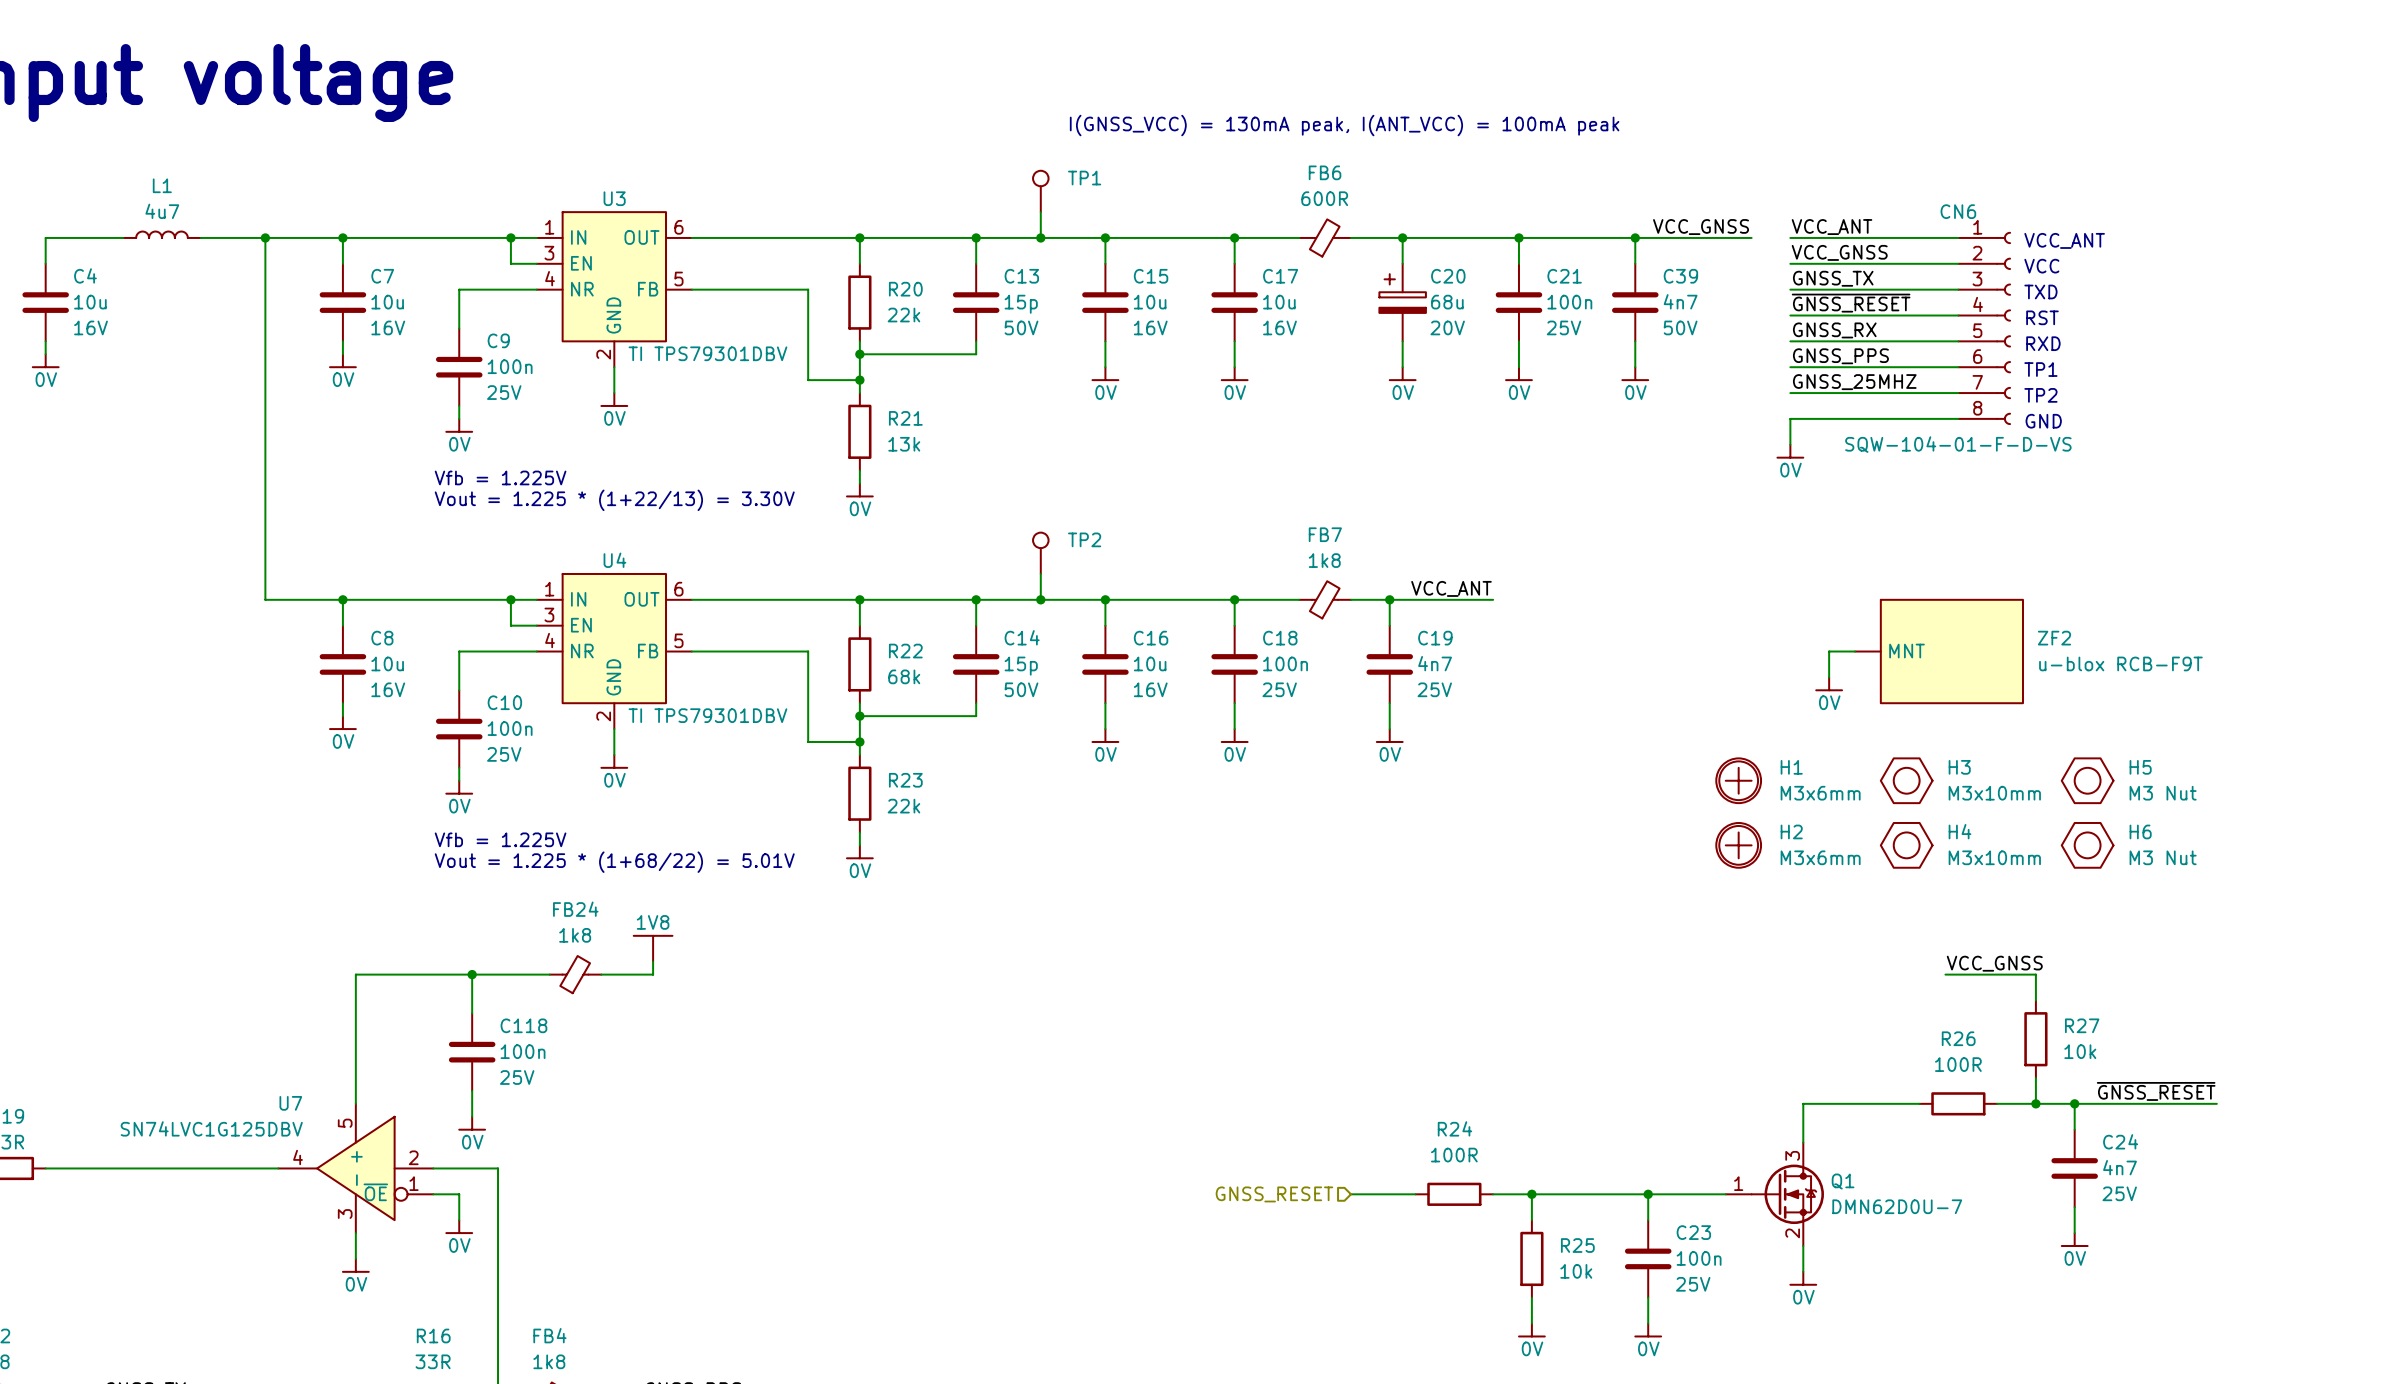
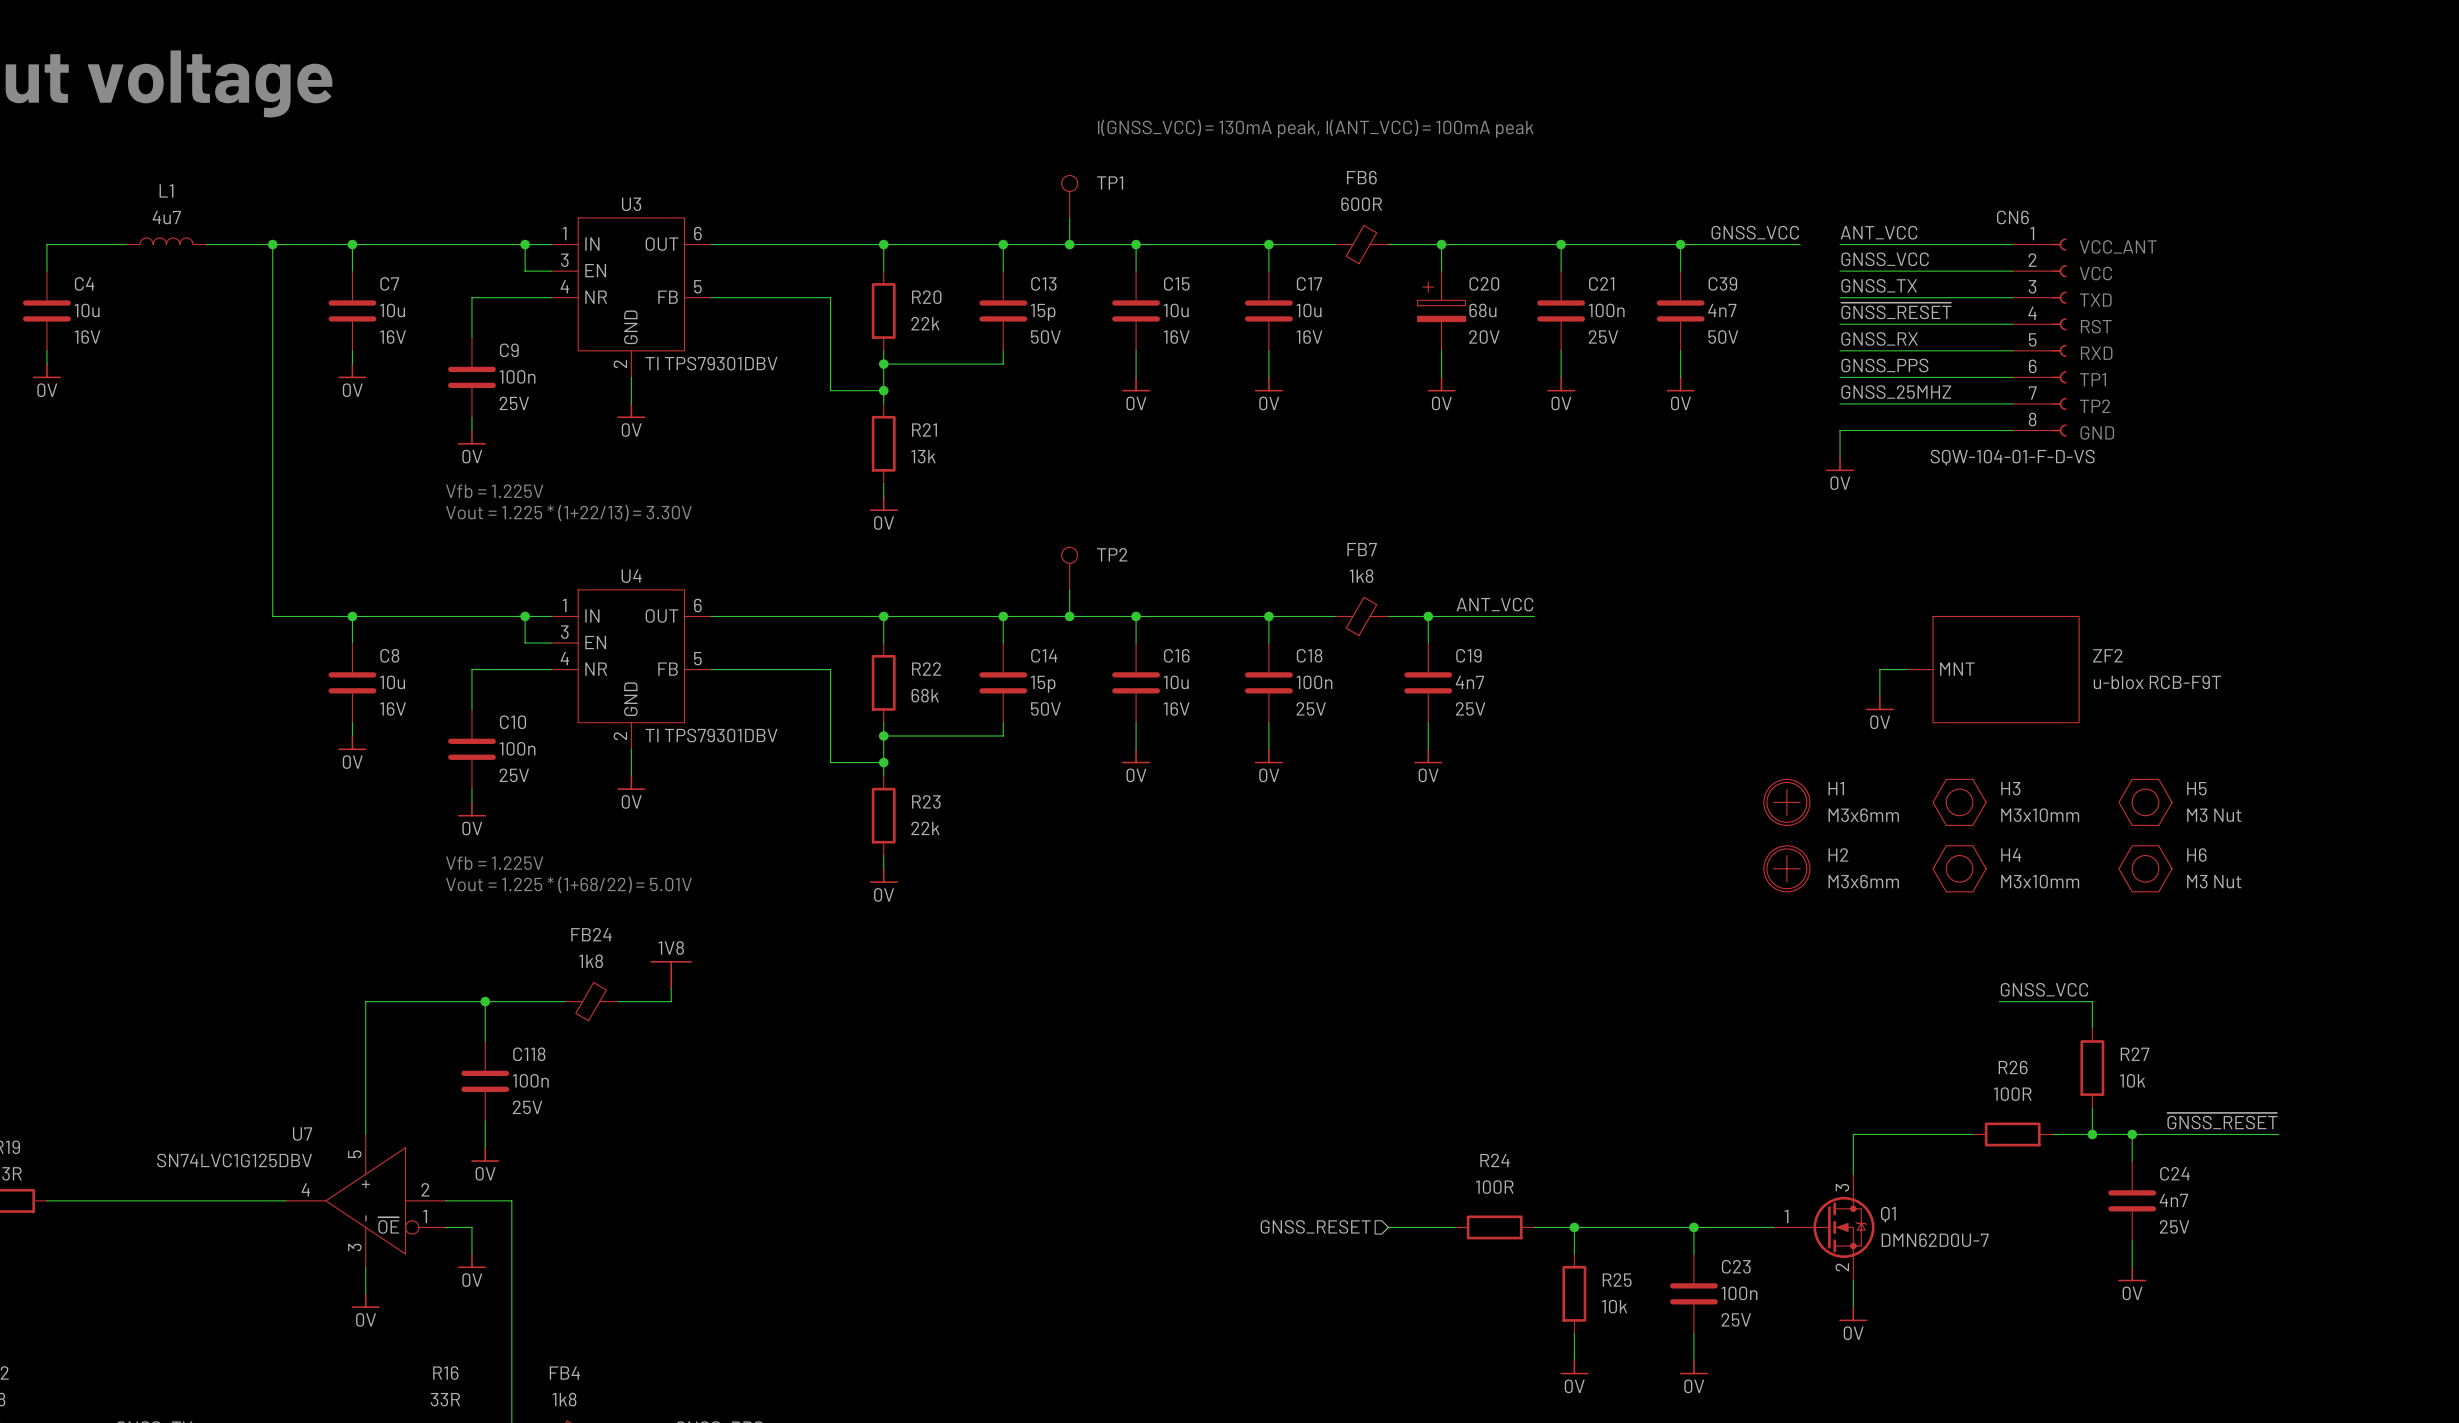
label: VCC_GNSS (1701, 227) -> GNSS_VCC (1755, 232)
label: VCC_ANT (1832, 227) -> ANT_VCC (1878, 232)
label: VCC_GNSS (1839, 252) -> GNSS_VCC (1885, 259)
label: VCC_ANT (1451, 588) -> ANT_VCC (1494, 604)
label: VCC_GNSS (1994, 963) -> GNSS_VCC (2044, 989)

